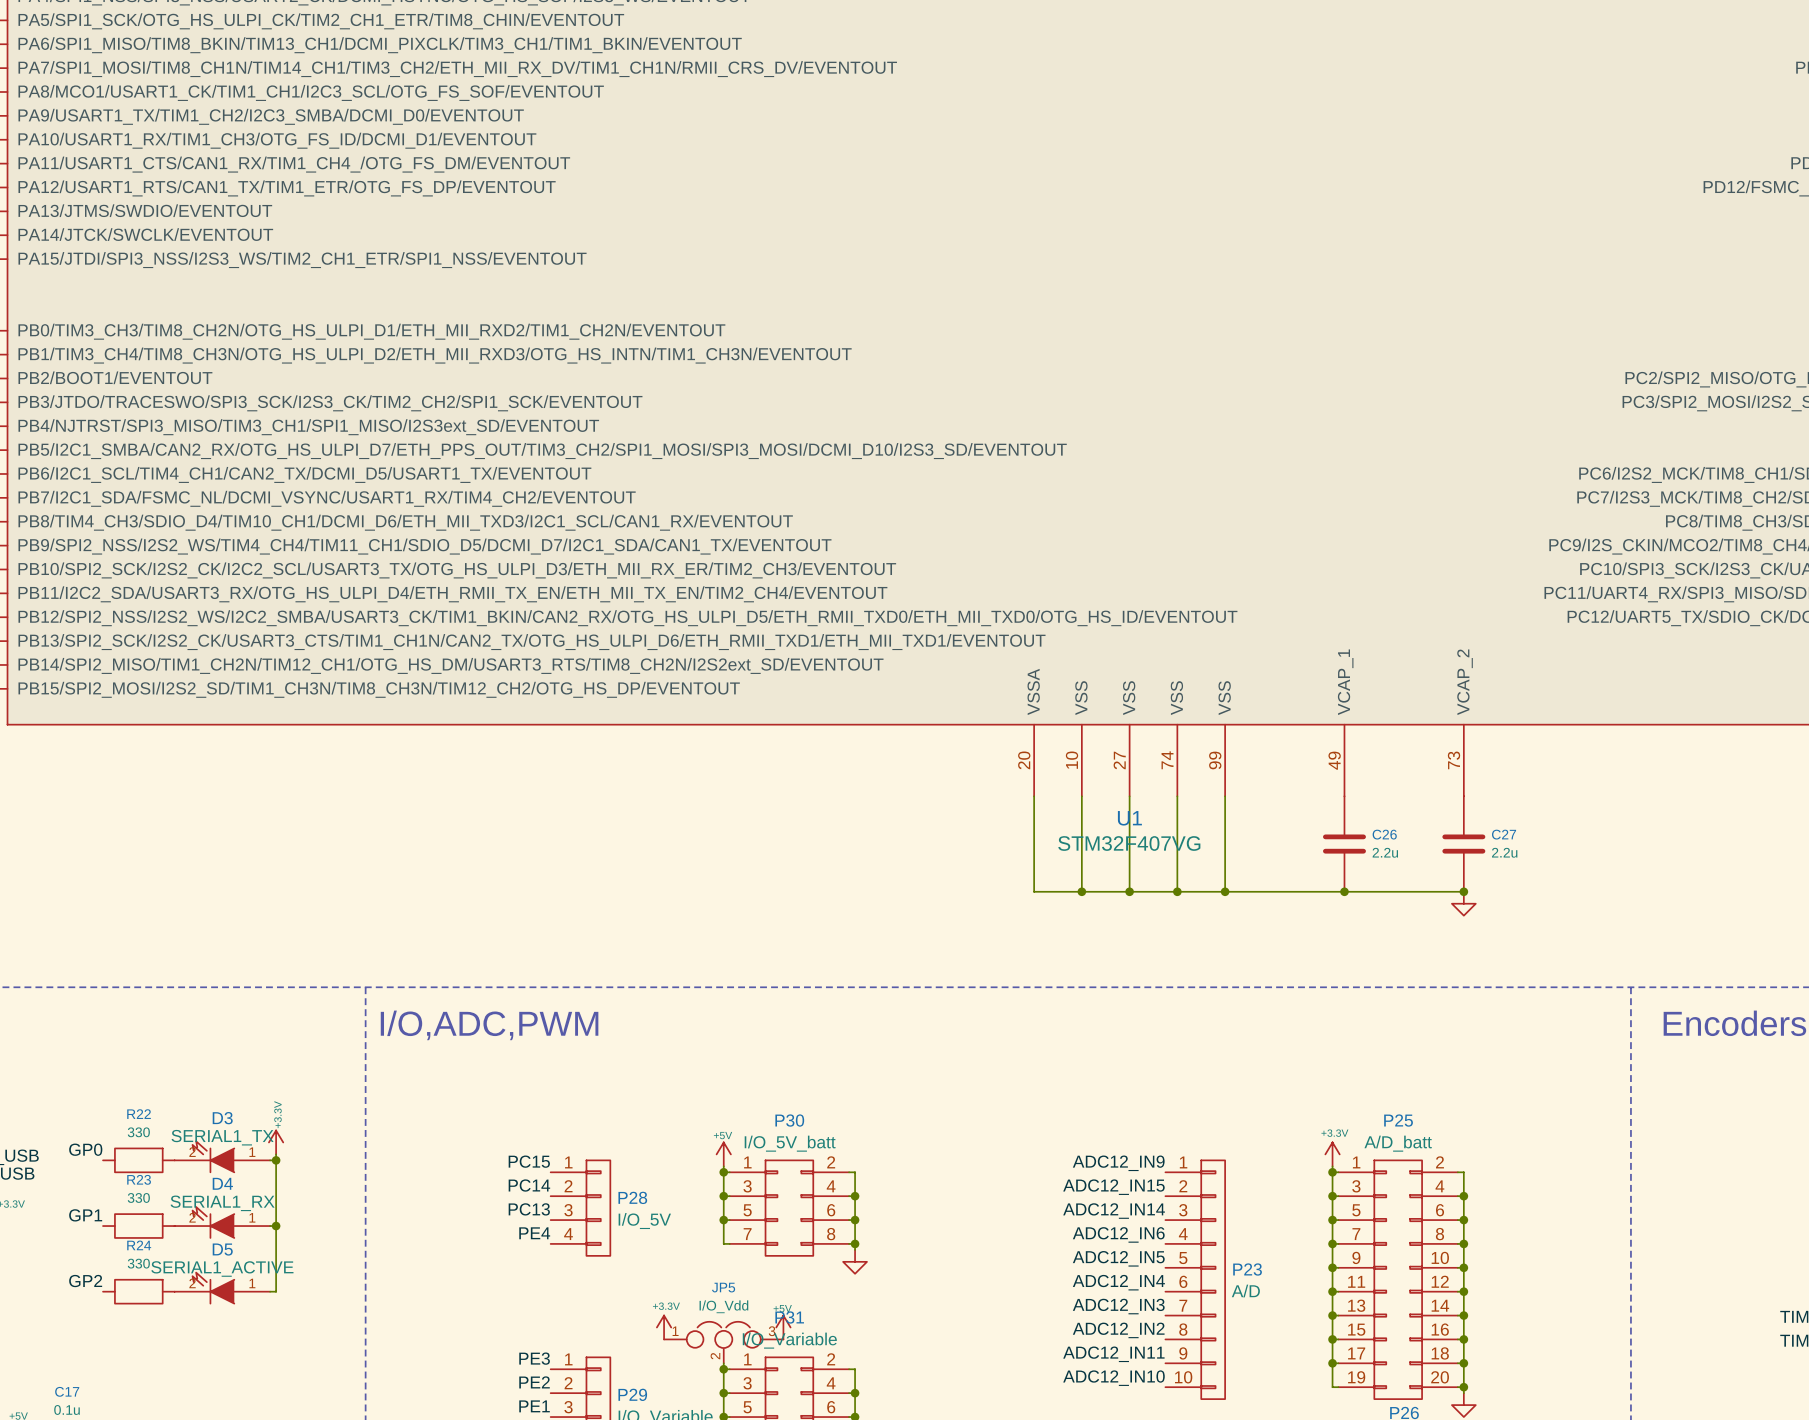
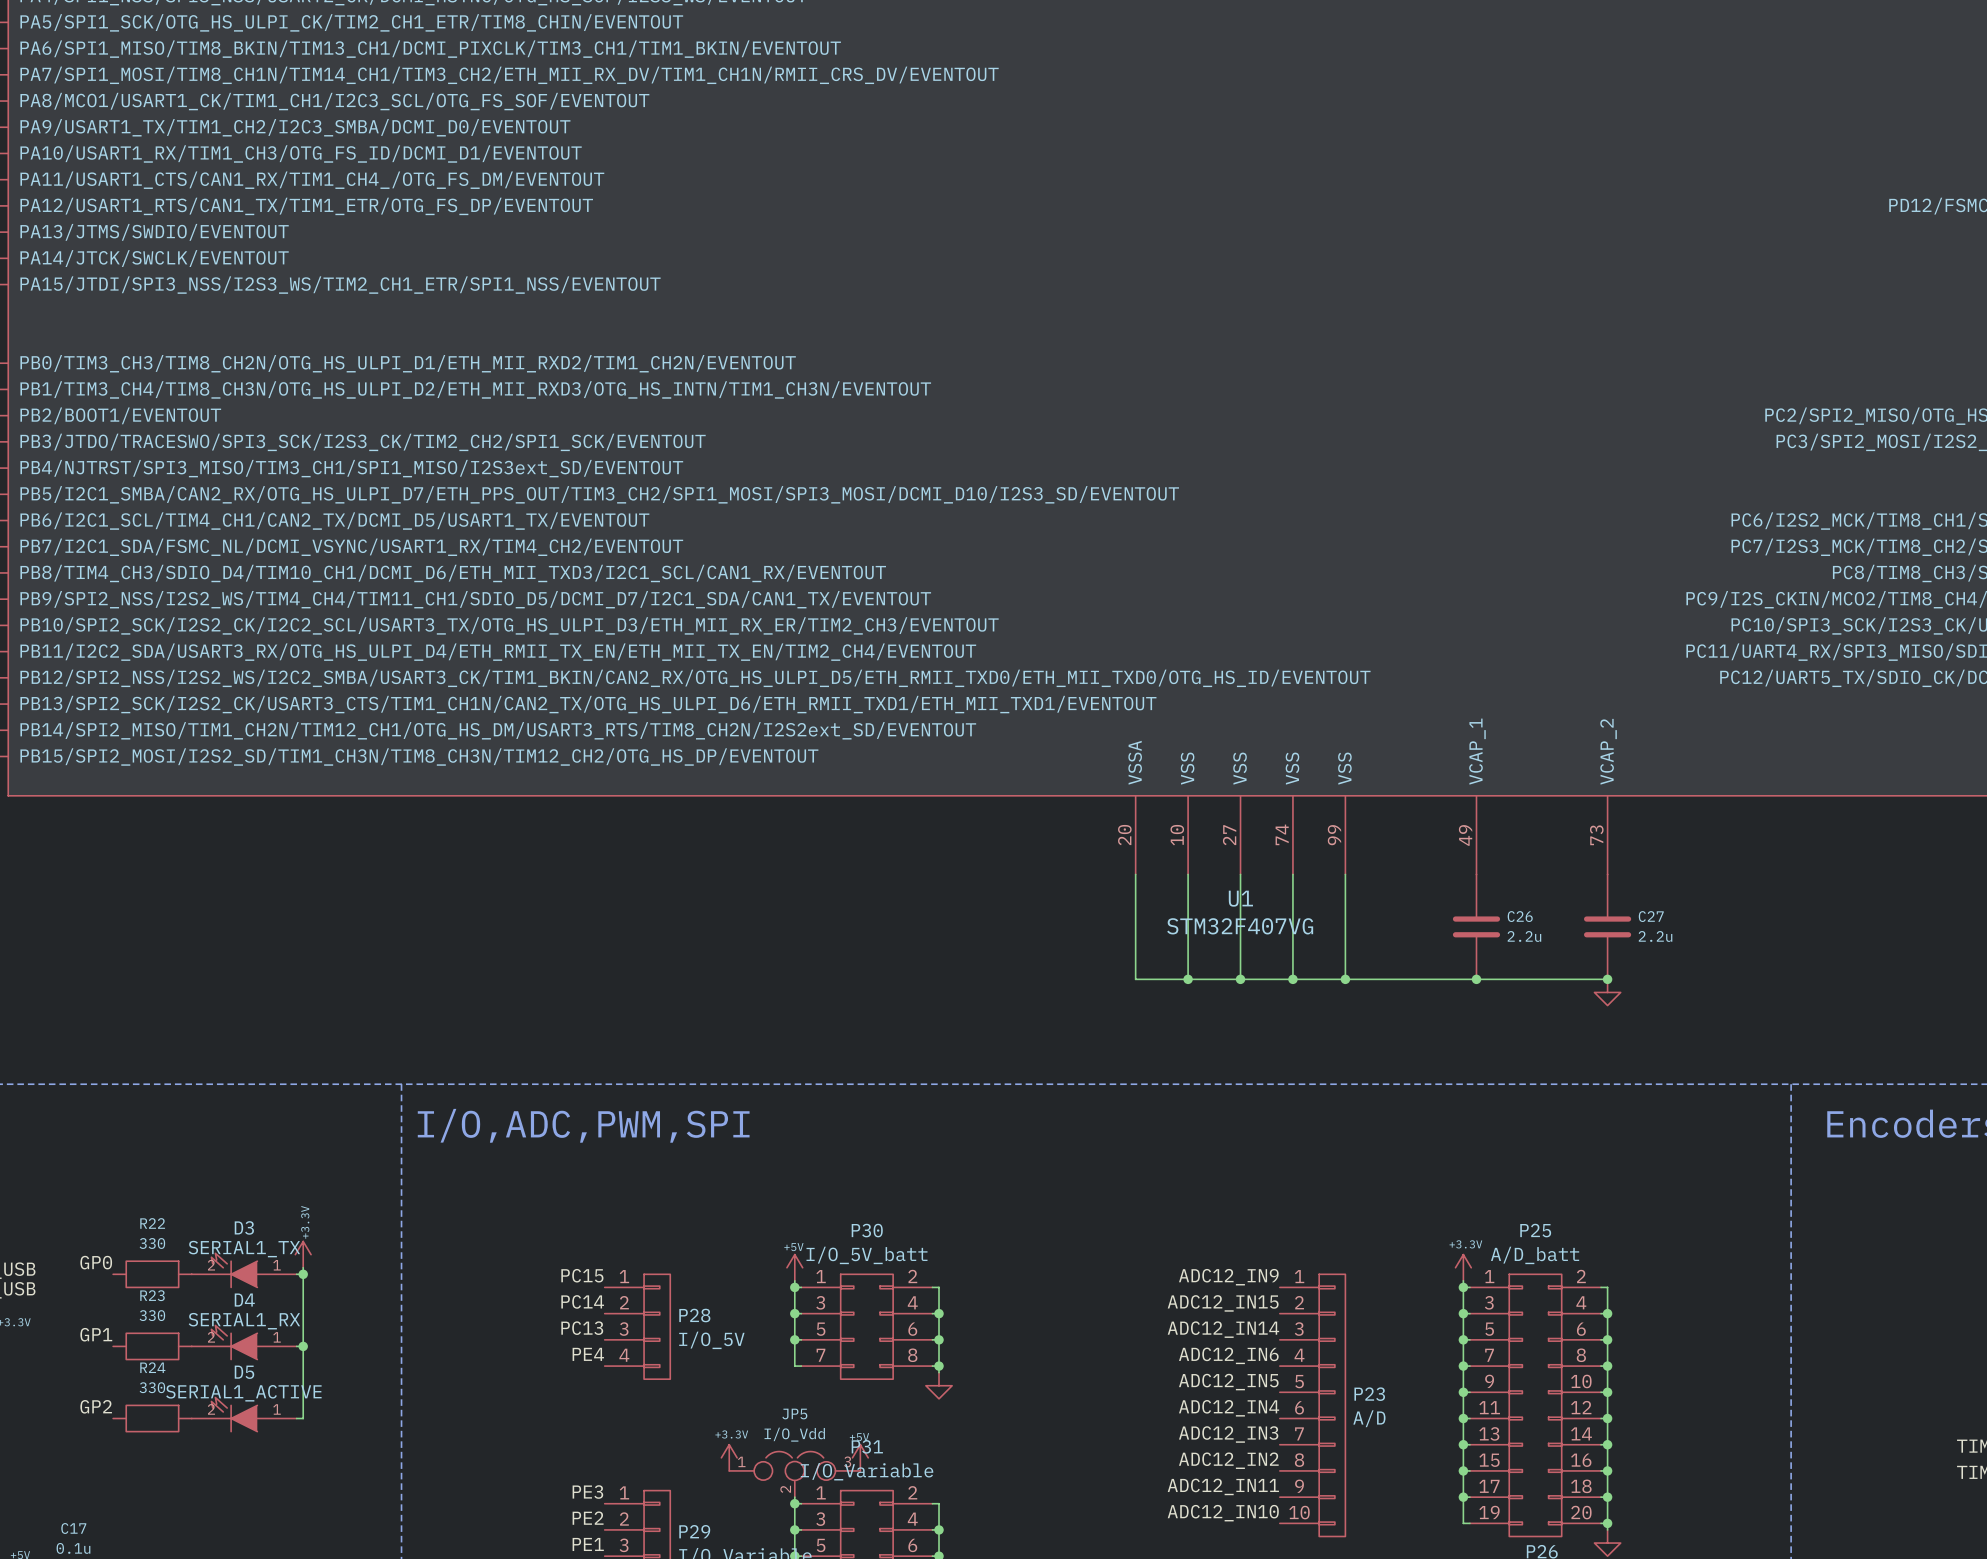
text: I/O,ADC,PWM (489, 1025) -> I/O,ADC,PWM,SPI (583, 1125)

